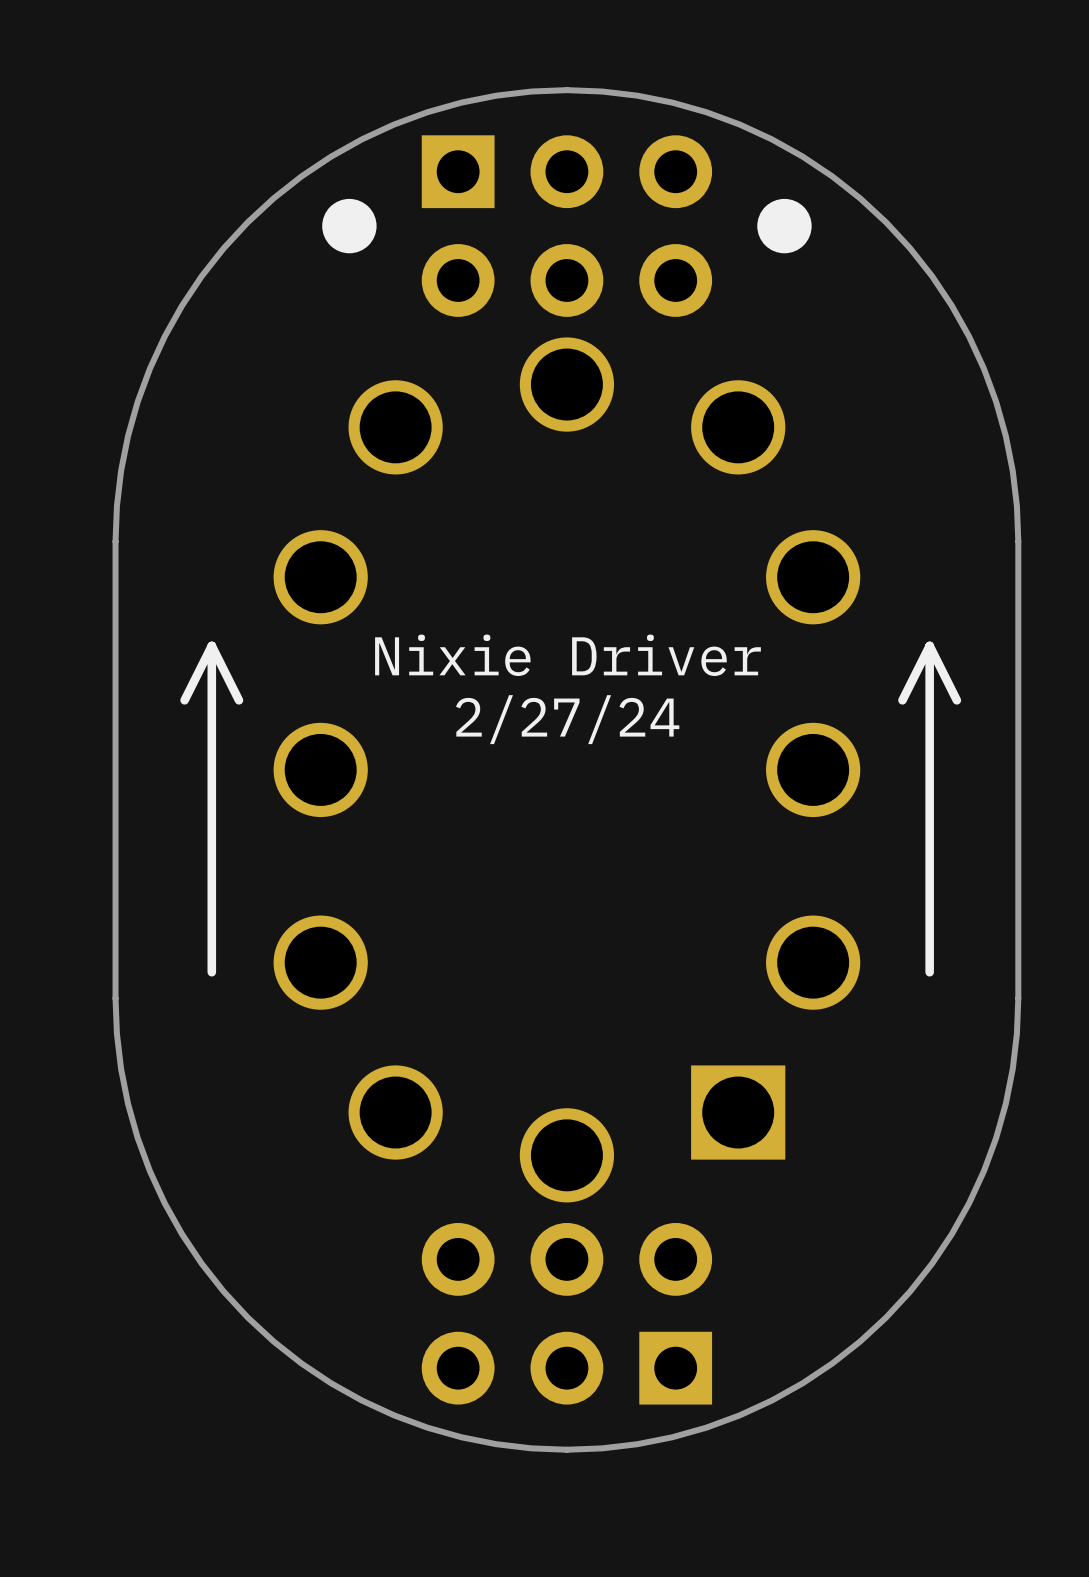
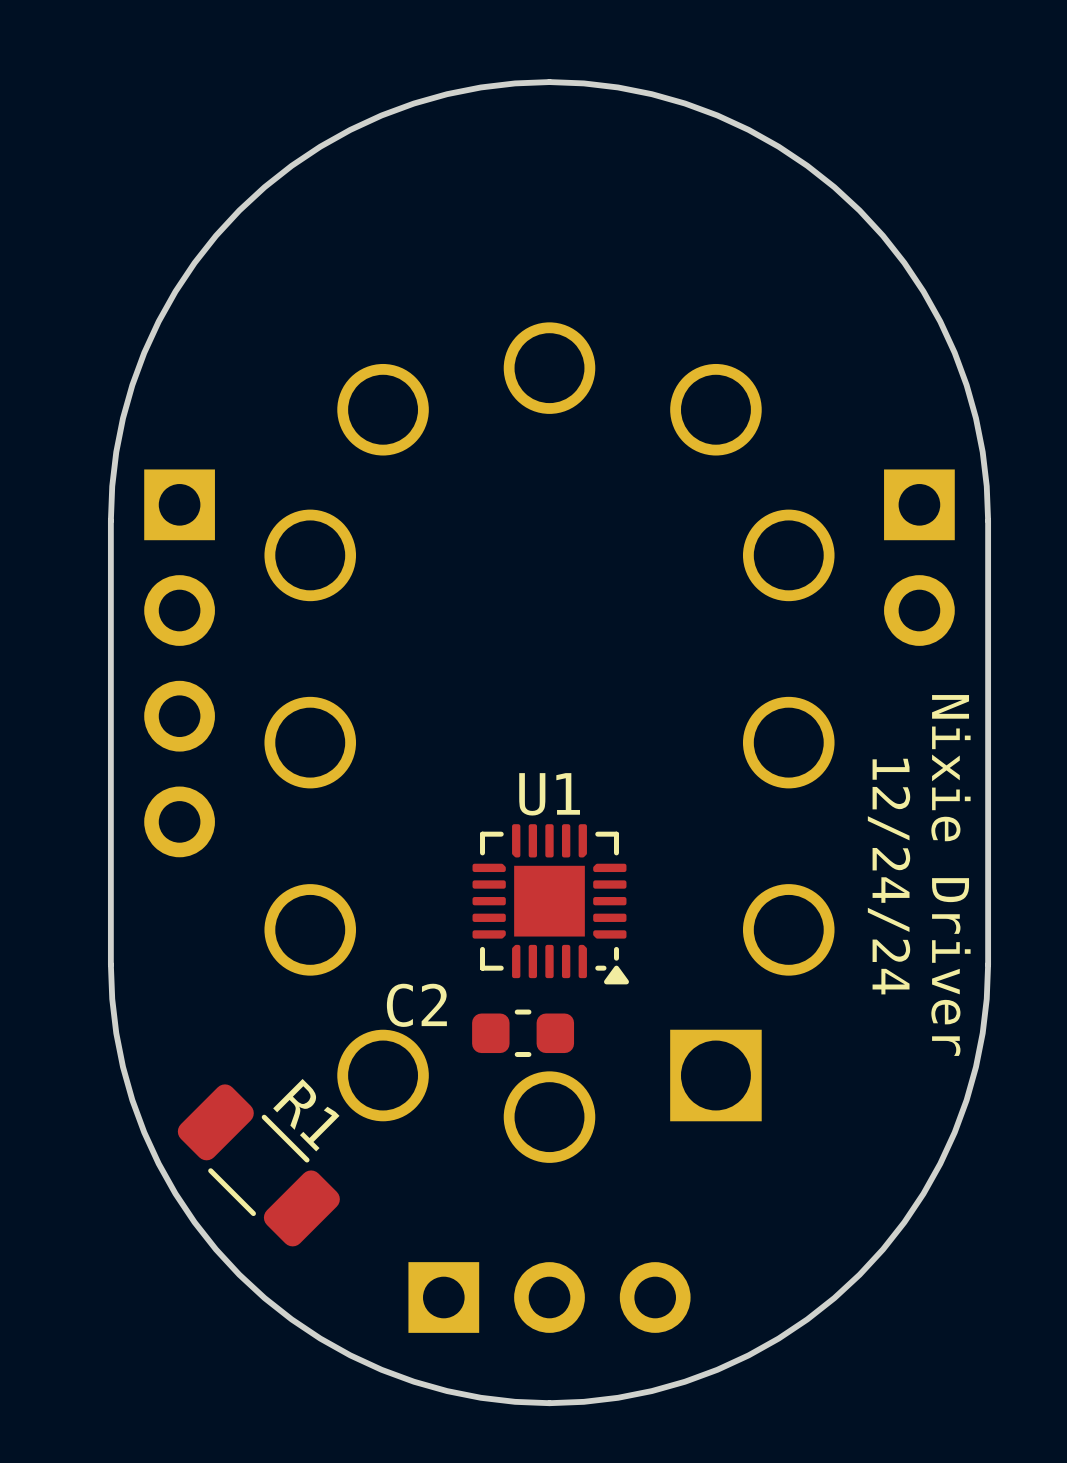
drawing: [322, 198, 377, 254] -> none
drawing: [757, 198, 812, 254] -> none
part: (566, 226) -> none
part: none -> (919, 557)
line: (211, 645) (211, 972) -> none
line: (211, 645) (238, 700) -> none
line: (211, 645) (184, 700) -> none
line: (929, 645) (902, 700) -> none
line: (929, 645) (956, 700) -> none
line: (929, 645) (929, 972) -> none
text rotation: 0° (567, 655) -> 90° clockwise (950, 875)
text position: Nixie Driver (567, 655) -> Nixie Driver (950, 875)
part: none -> (179, 663)
text: 2/27/24 (567, 719) -> none
text: none -> 12/24/24 (889, 876)
U1: none -> (550, 904)
C2: none -> (523, 1033)
R1: none -> (258, 1165)
part footprint: [421, 1223, 713, 1405] -> [408, 1262, 691, 1333]

